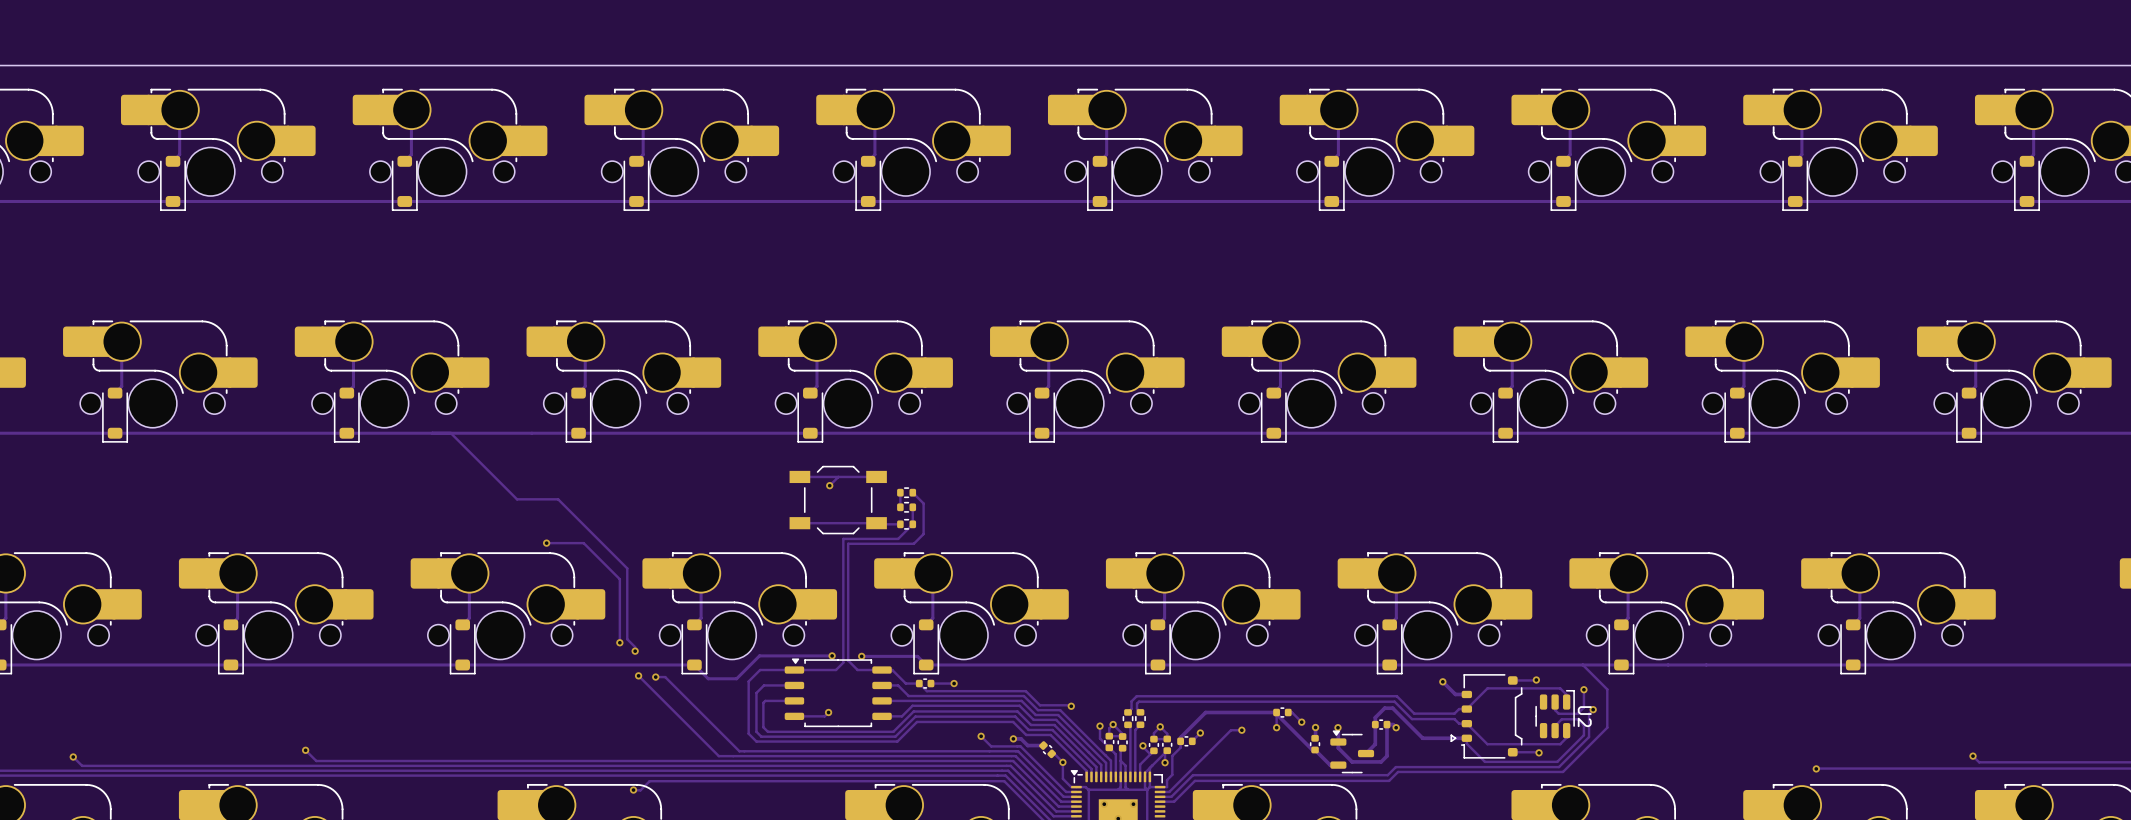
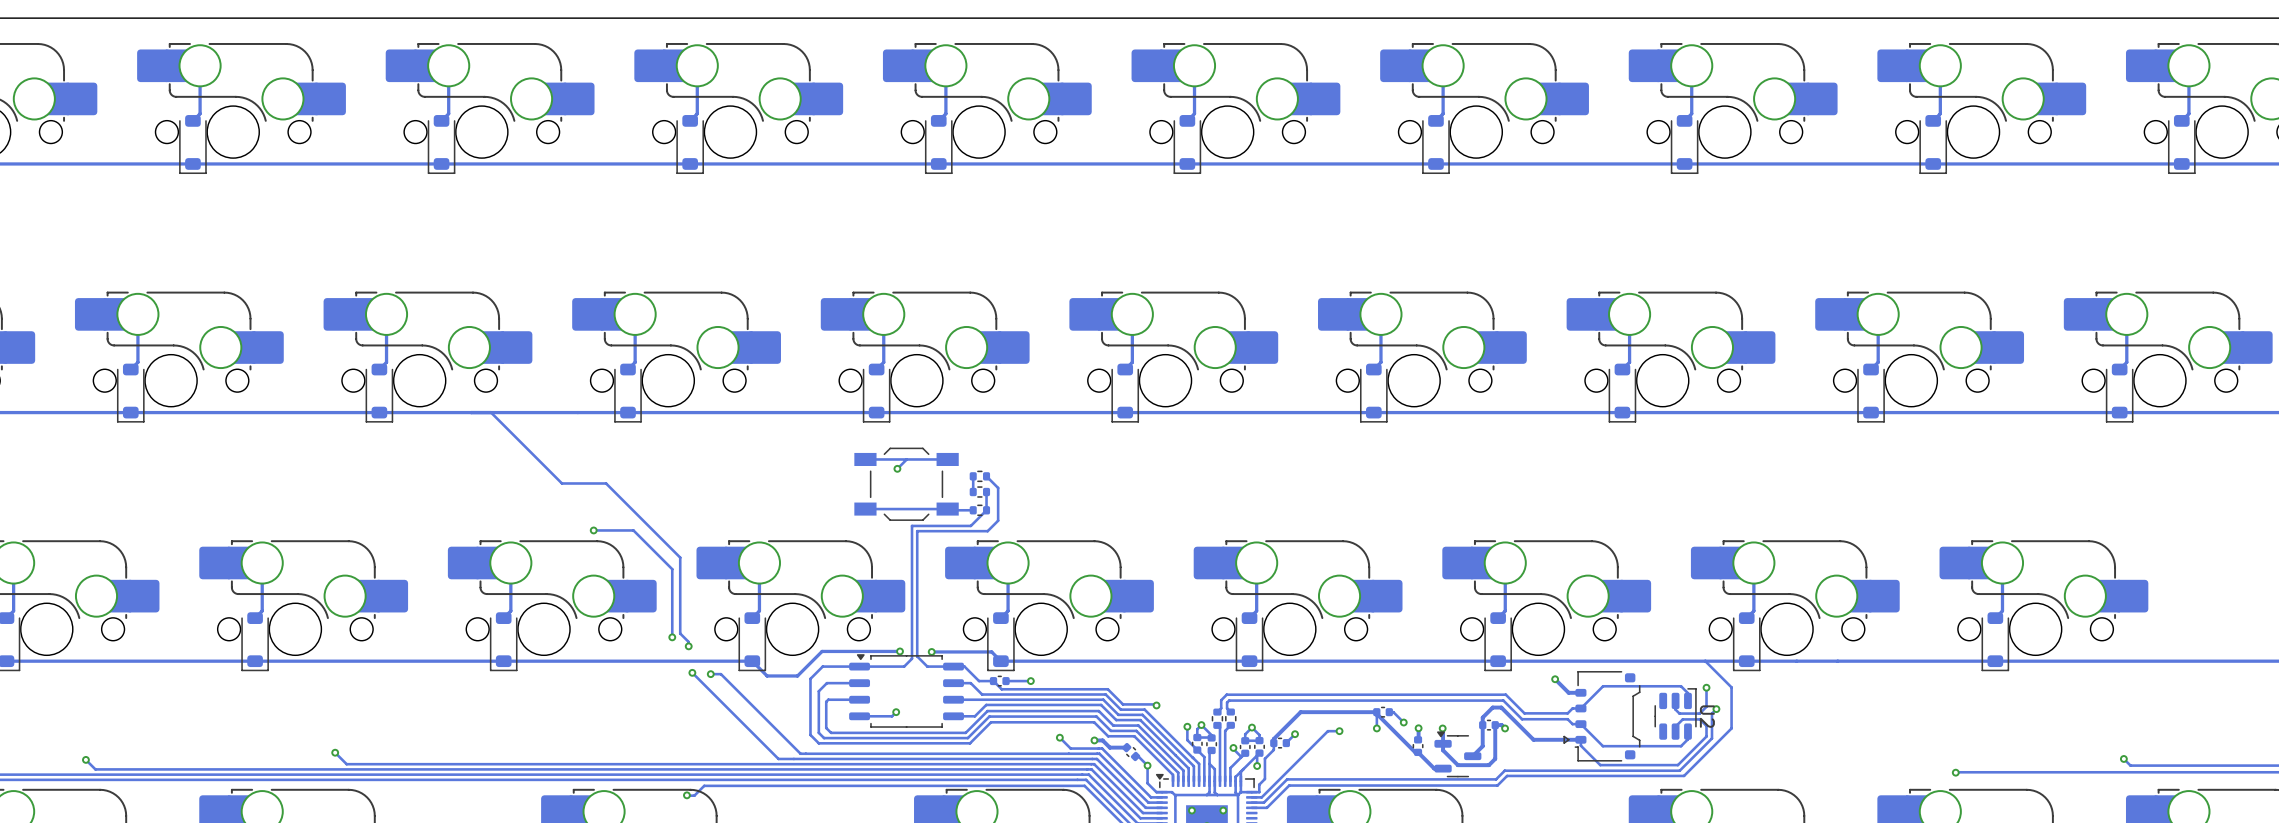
track: (1536, 679) (1512, 680) -> none
via: (1536, 679) -> none
track: (1512, 752) (1539, 752) -> none
via: (1539, 752) -> none

